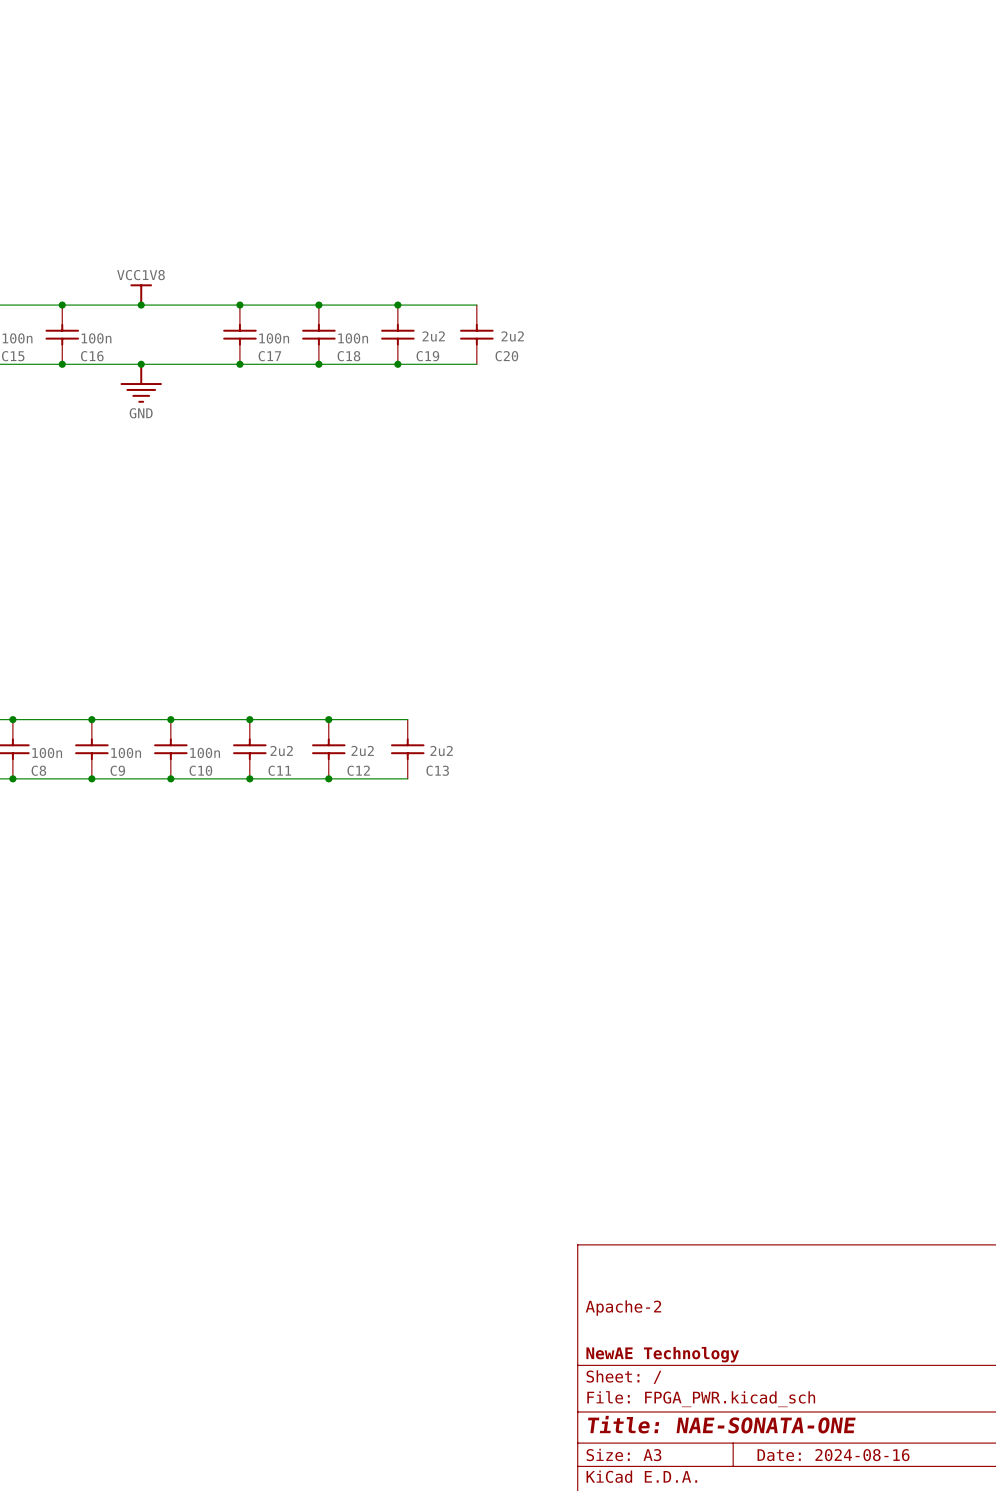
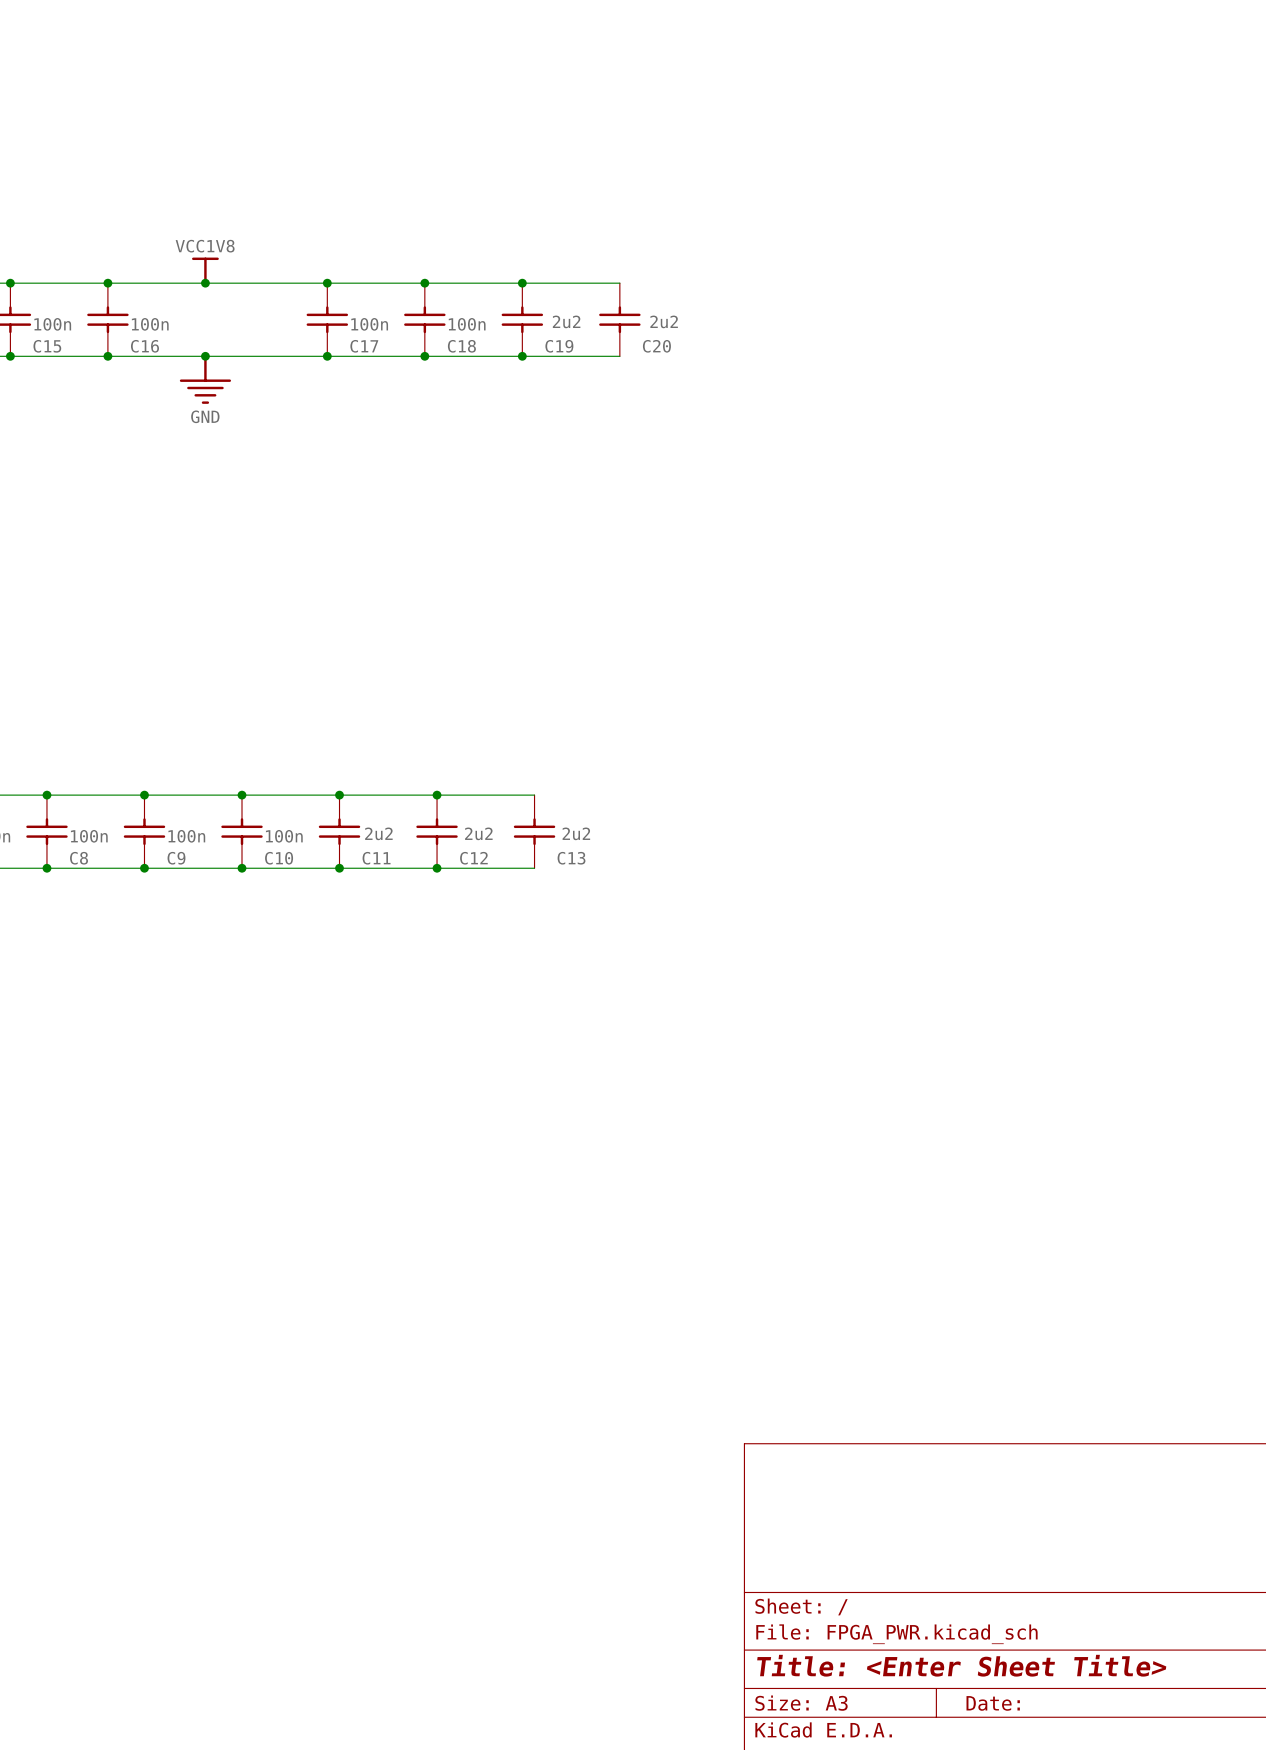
title block: Apache-2 (623, 1308) -> none
title block: NewAE Technology (662, 1354) -> none
title block: Title: NAE-SONATA-ONE (721, 1424) -> Title: <Enter Sheet Title> (961, 1665)
title block: Date: 2024-08-16 (833, 1455) -> Date: (993, 1703)

